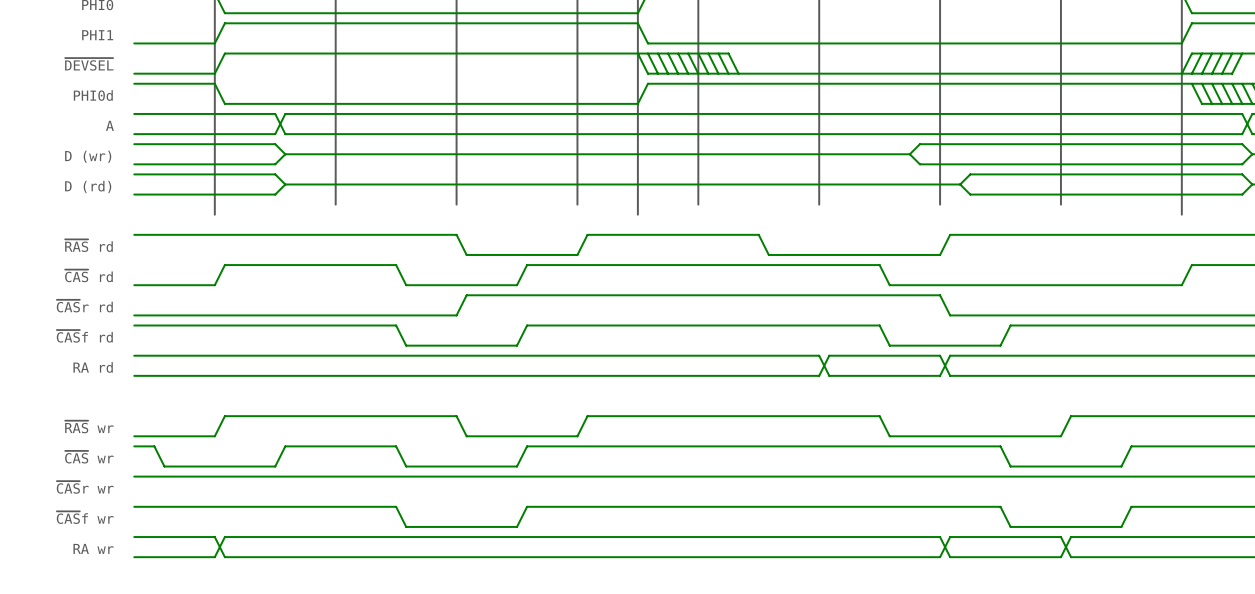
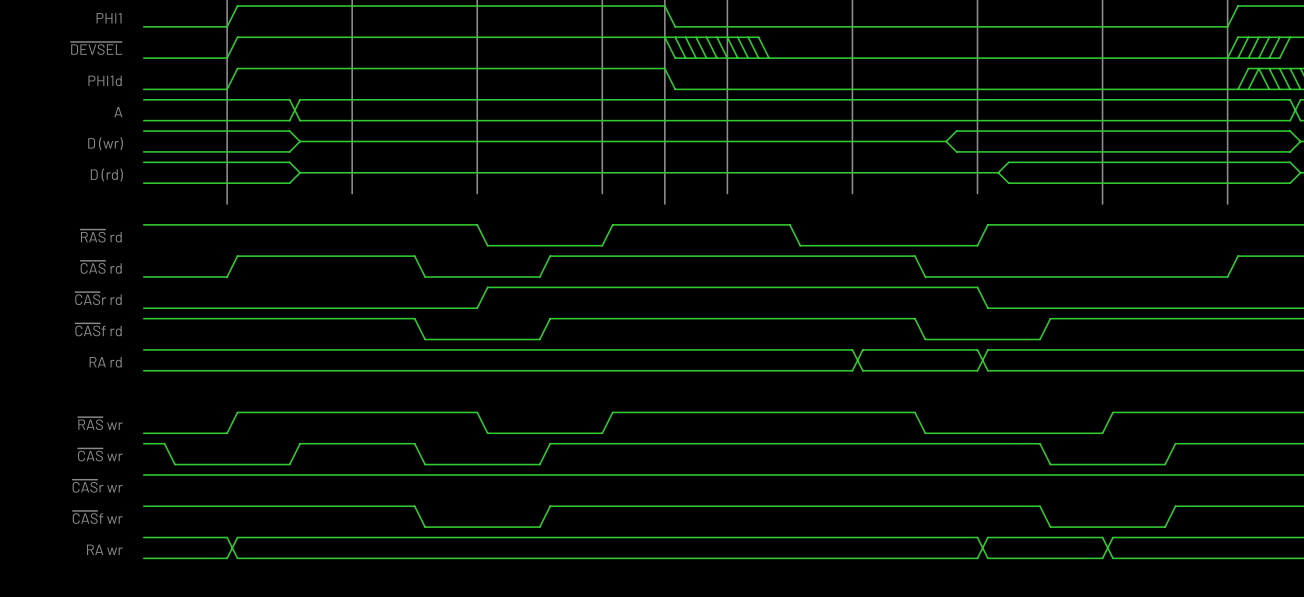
wire: (134, 83) (214, 83) (224, 103) (637, 103) (647, 83) (1201, 83) (1212, 103) -> none
wire: (1191, 83) (1201, 103) -> none
wire: none -> (1248, 68) (1238, 89)
wire: none -> (1258, 68) (1248, 89) (675, 89) (664, 68) (237, 68) (227, 89) (143, 89)
text: PHI0d (93, 95) -> PHI1d (105, 80)
bus: none -> (1102, 193) (1102, 204)

